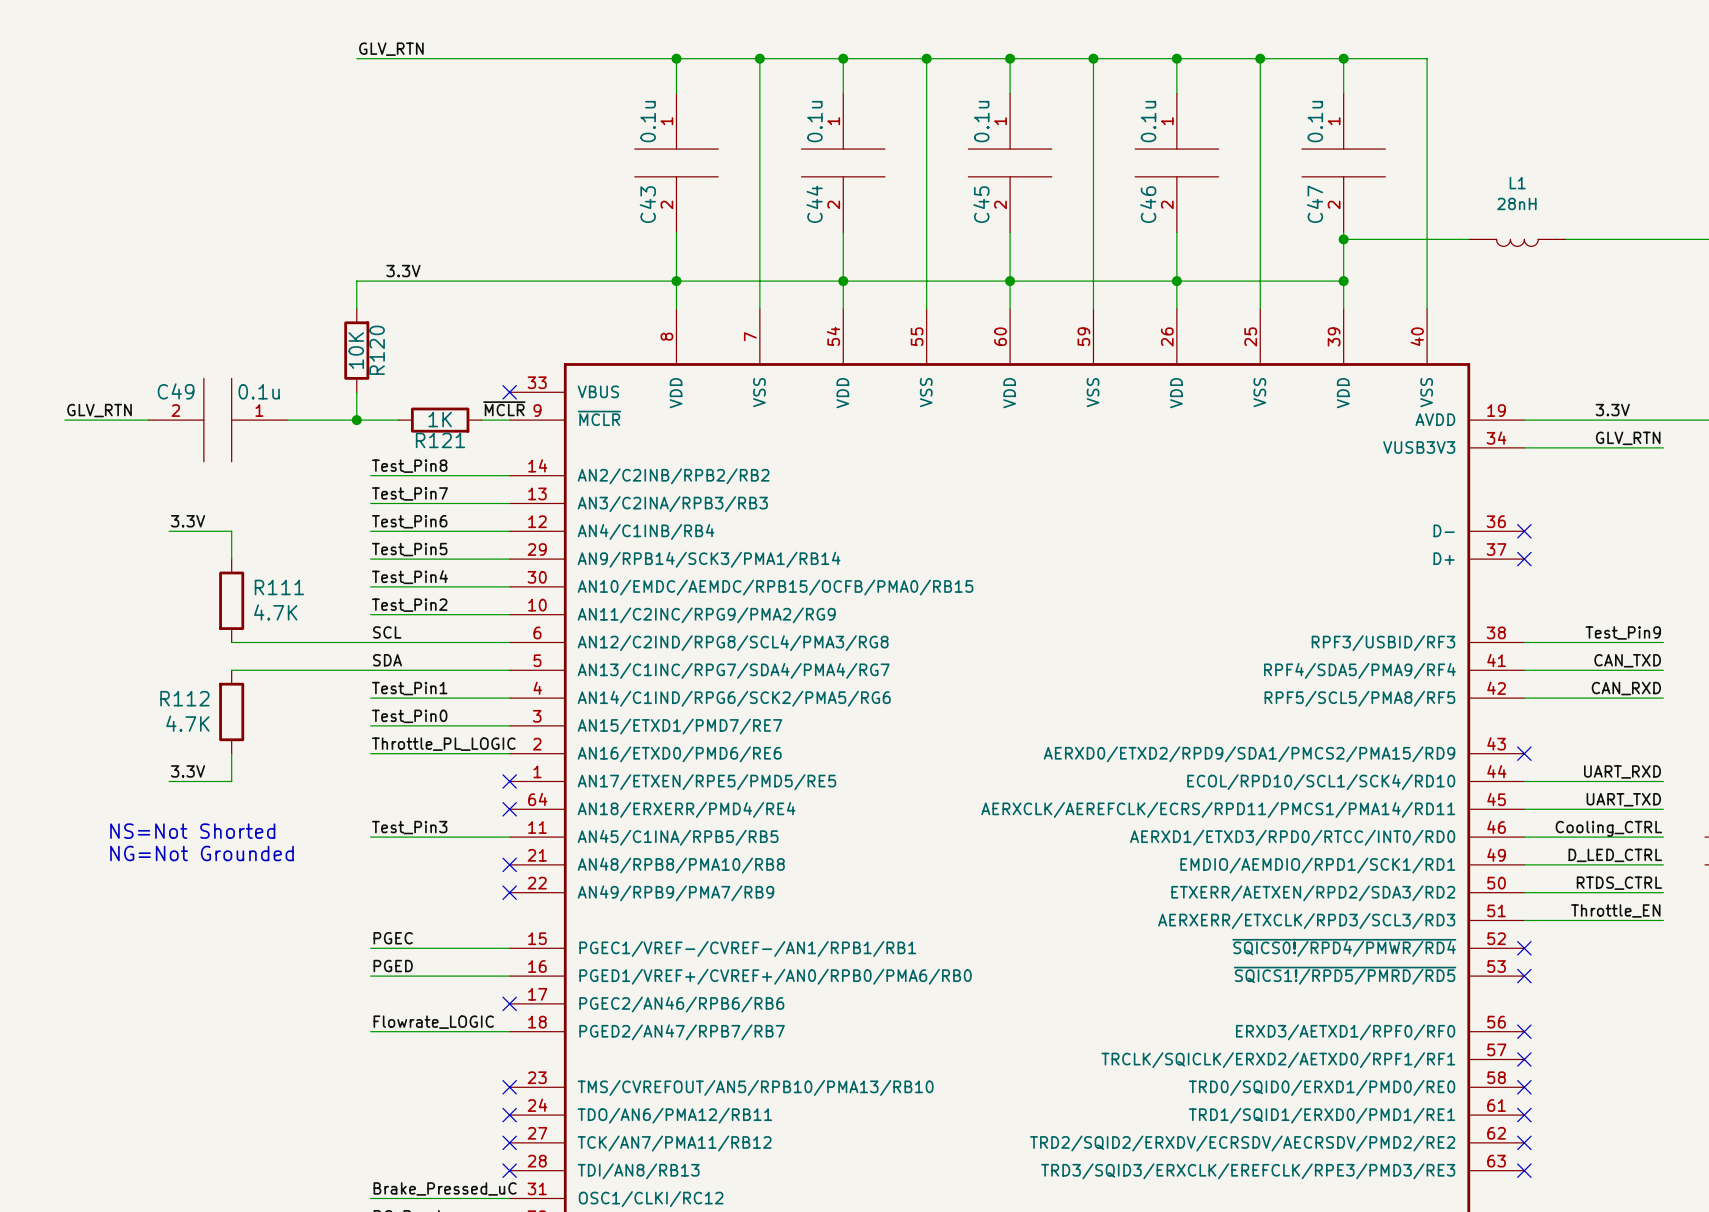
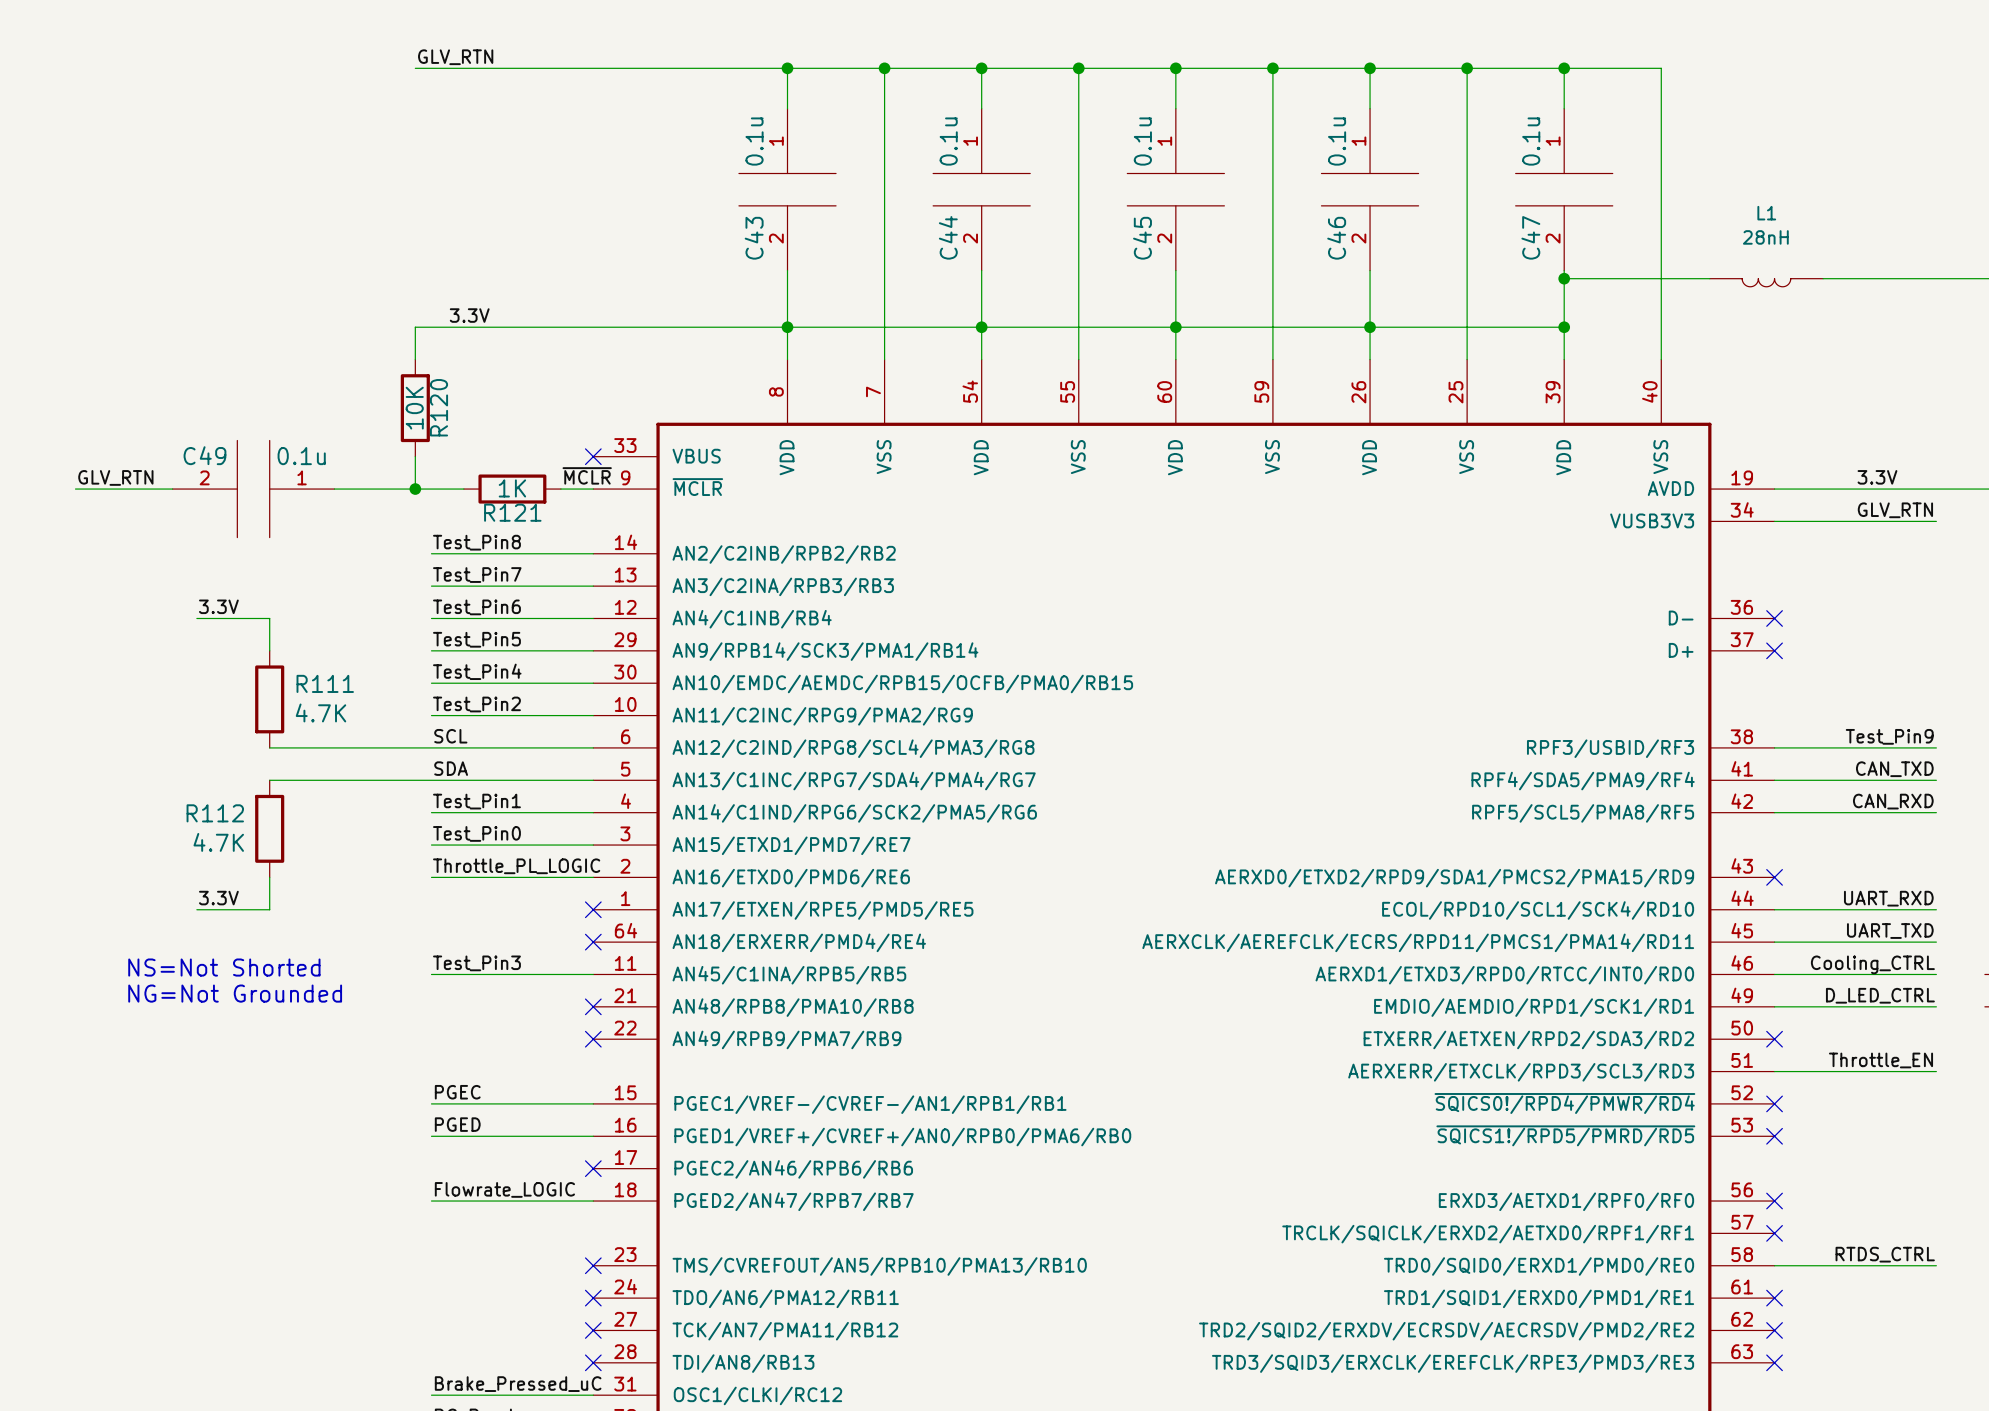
label position: RTDS_CTRL (1619, 883) -> RTDS_CTRL (1885, 1254)
wire: (1524, 892) (1663, 892) -> (1774, 1265) (1936, 1265)
no-connect mark: none -> (1774, 1039)
no-connect mark: (1524, 1087) -> none

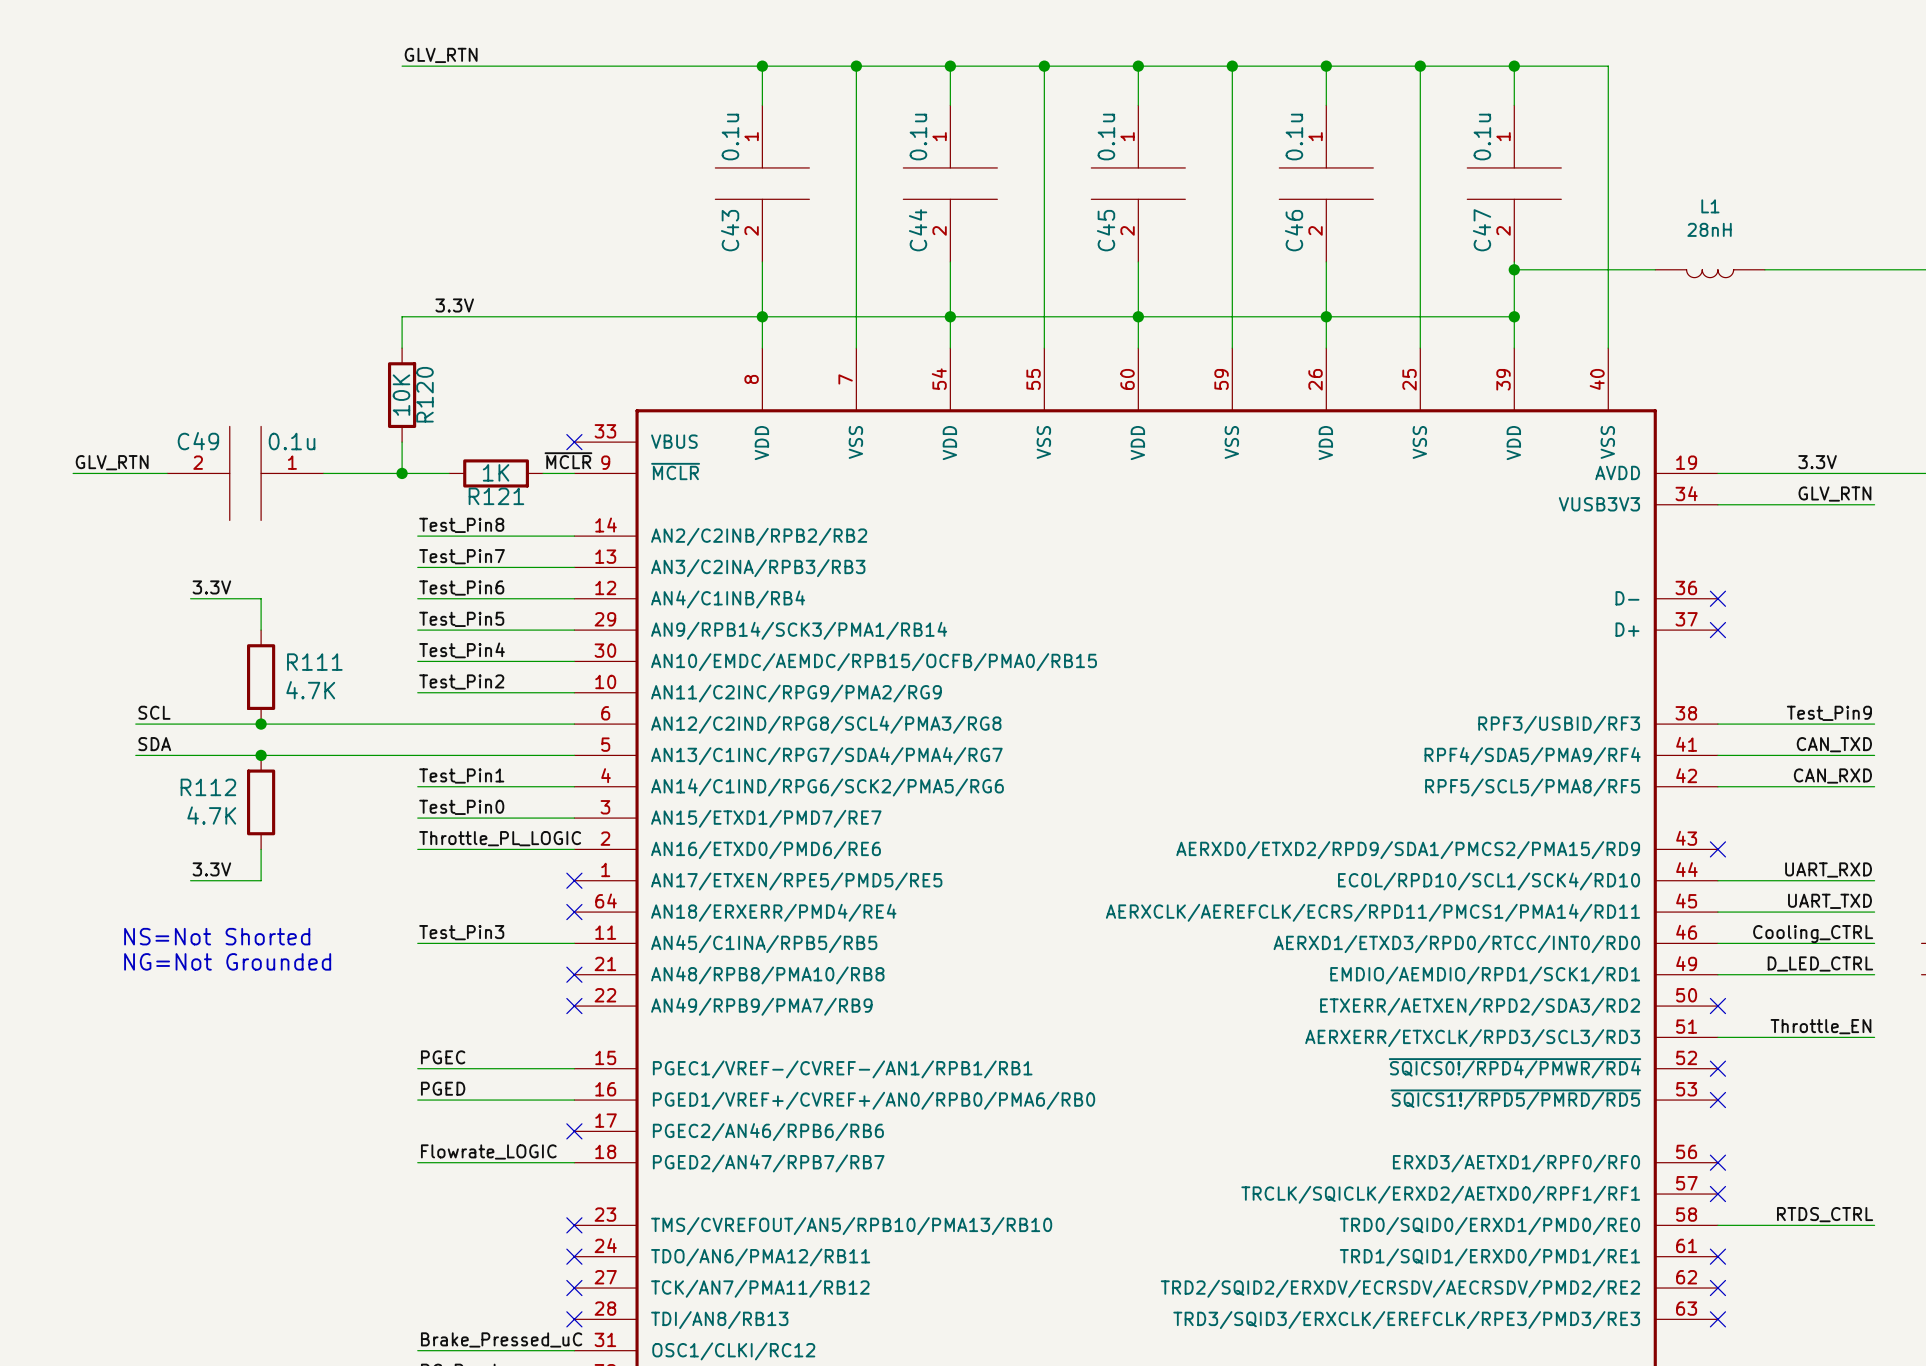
label position: SCL (450, 736) -> SCL (154, 712)
wire: none -> (135, 724) (261, 724)
junction: none -> (261, 724)
label position: SDA (451, 768) -> SDA (154, 744)
wire: none -> (135, 755) (261, 755)
junction: none -> (261, 755)

